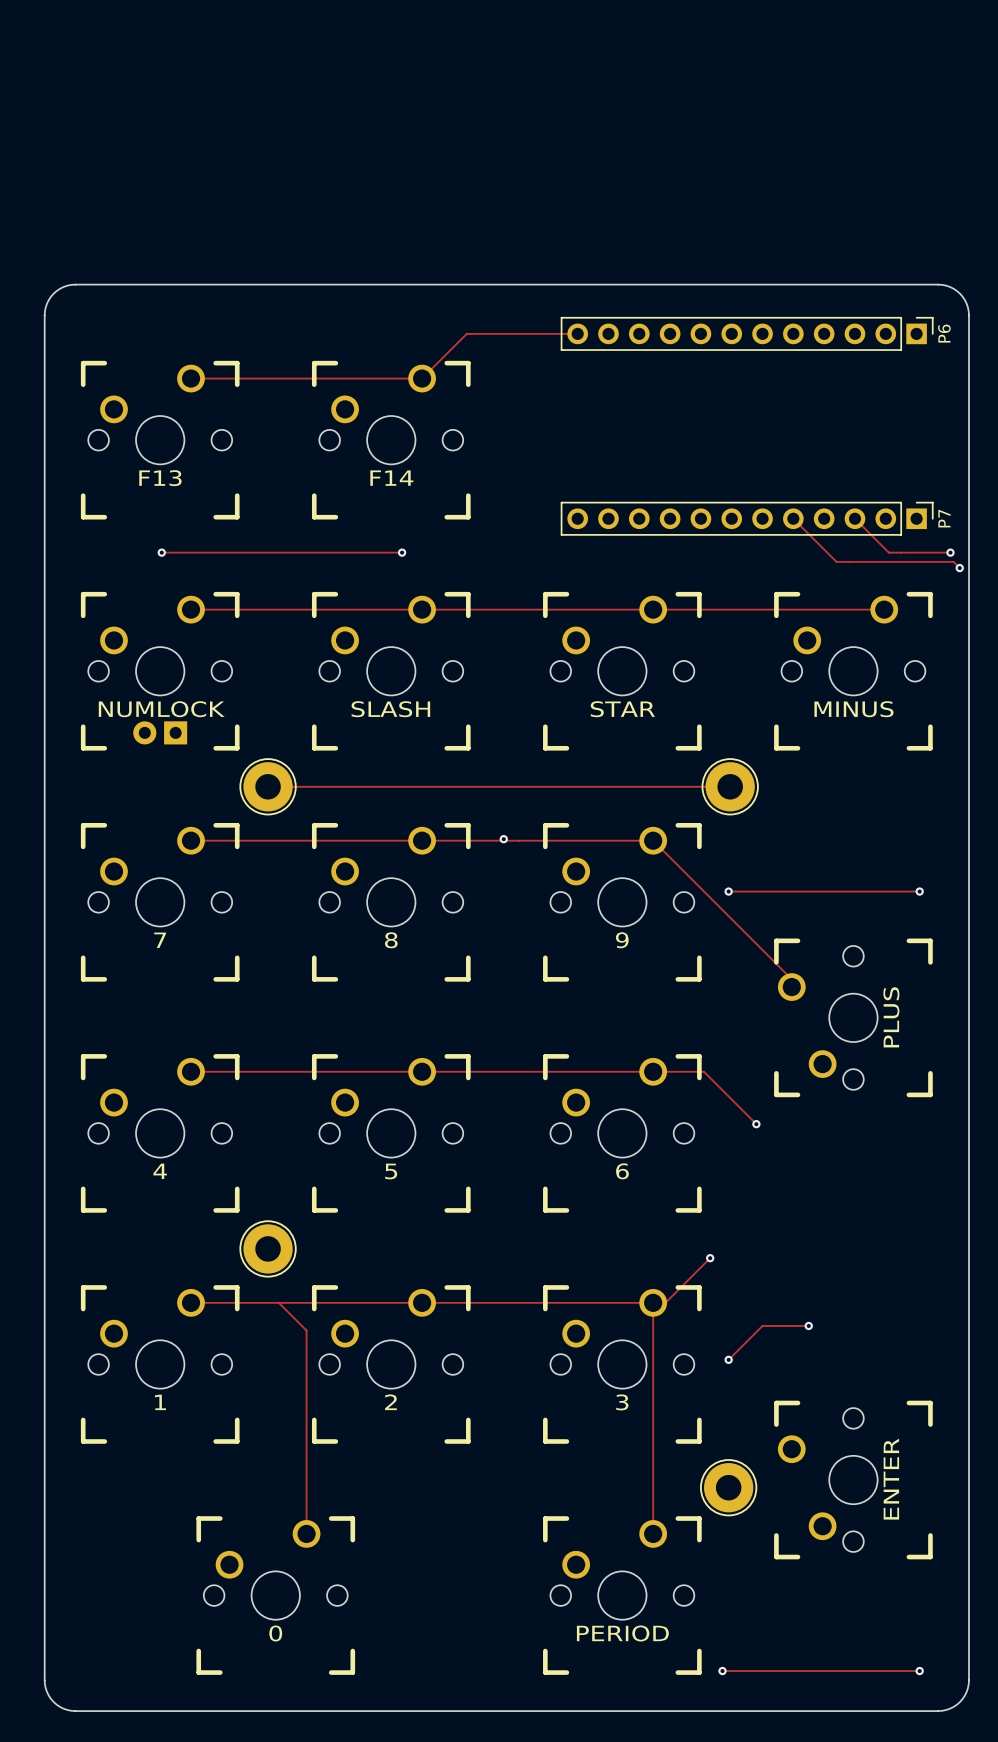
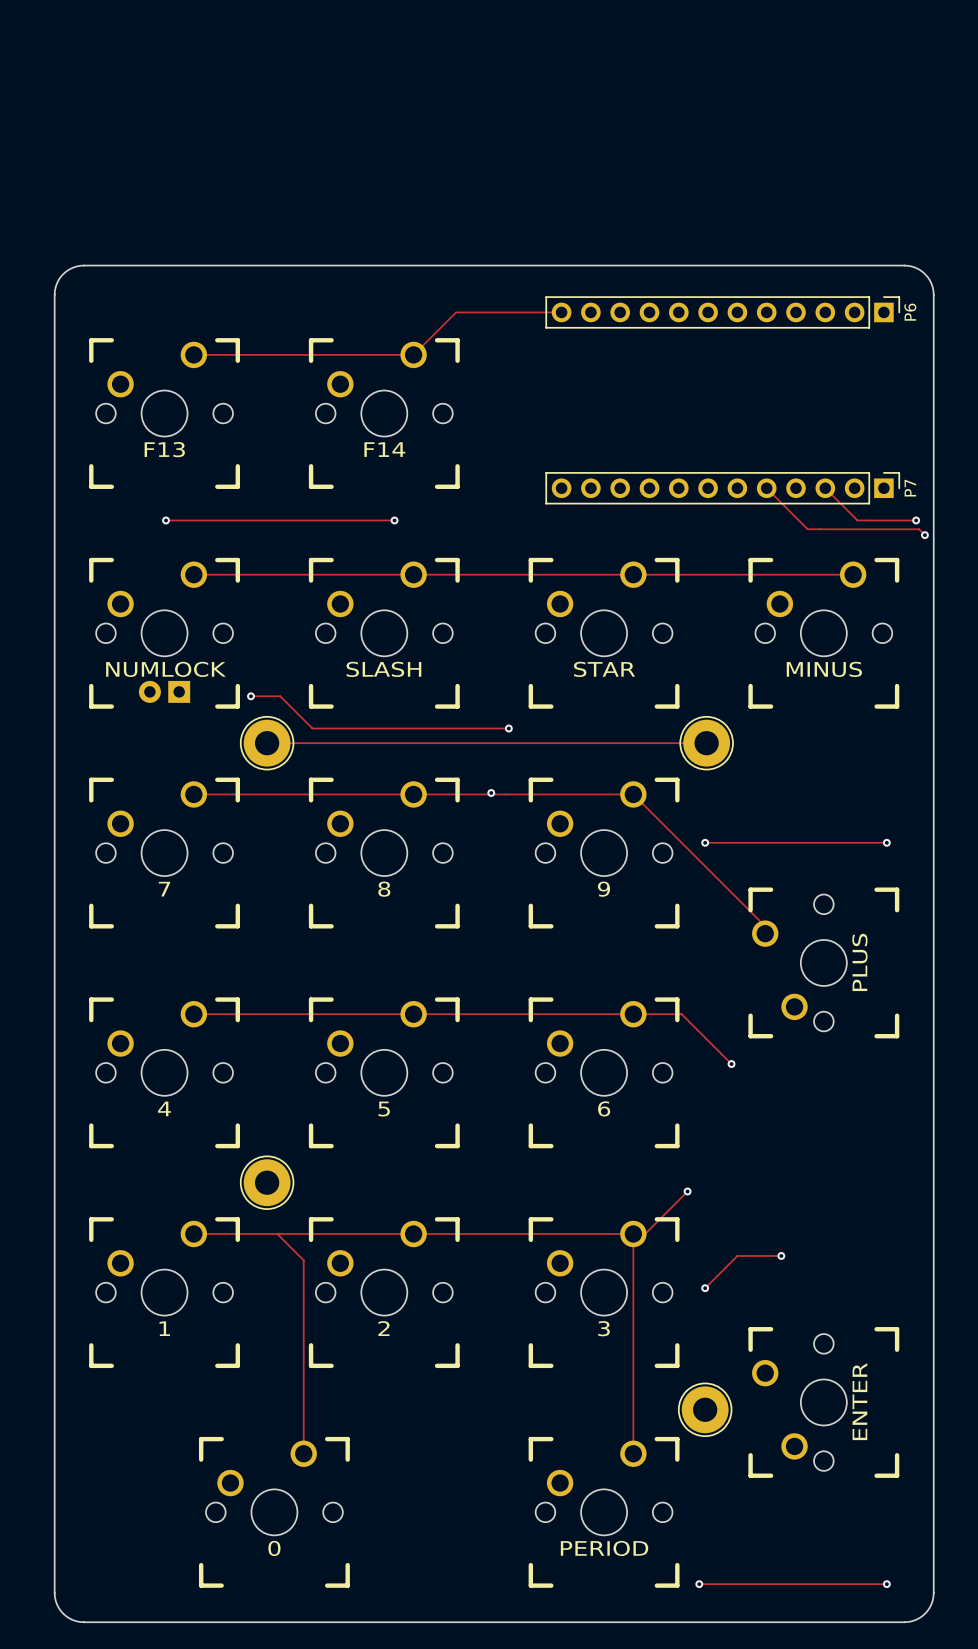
track: none -> (250, 696) (280, 696) (312, 728) (508, 728)
via: none -> (250, 696)
via: none -> (508, 728)

